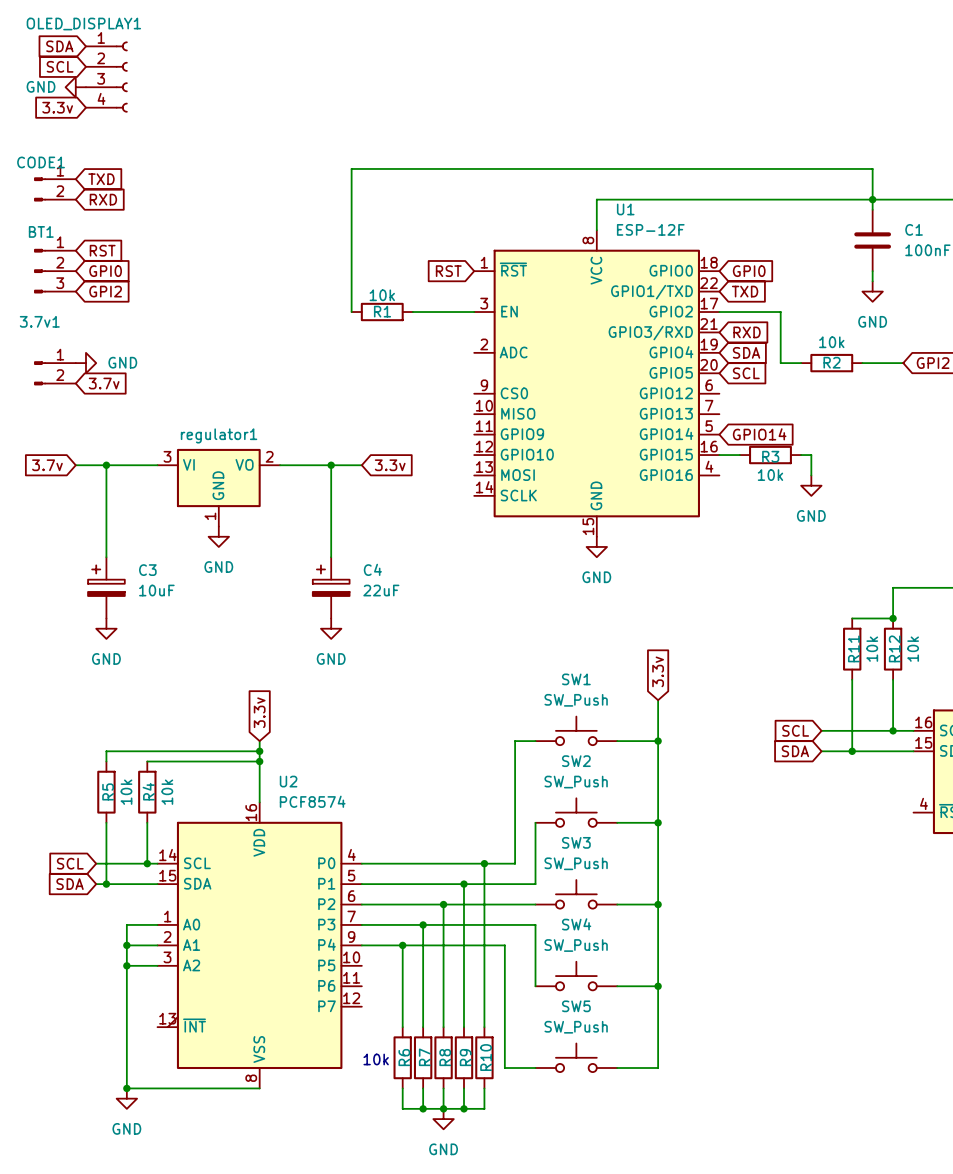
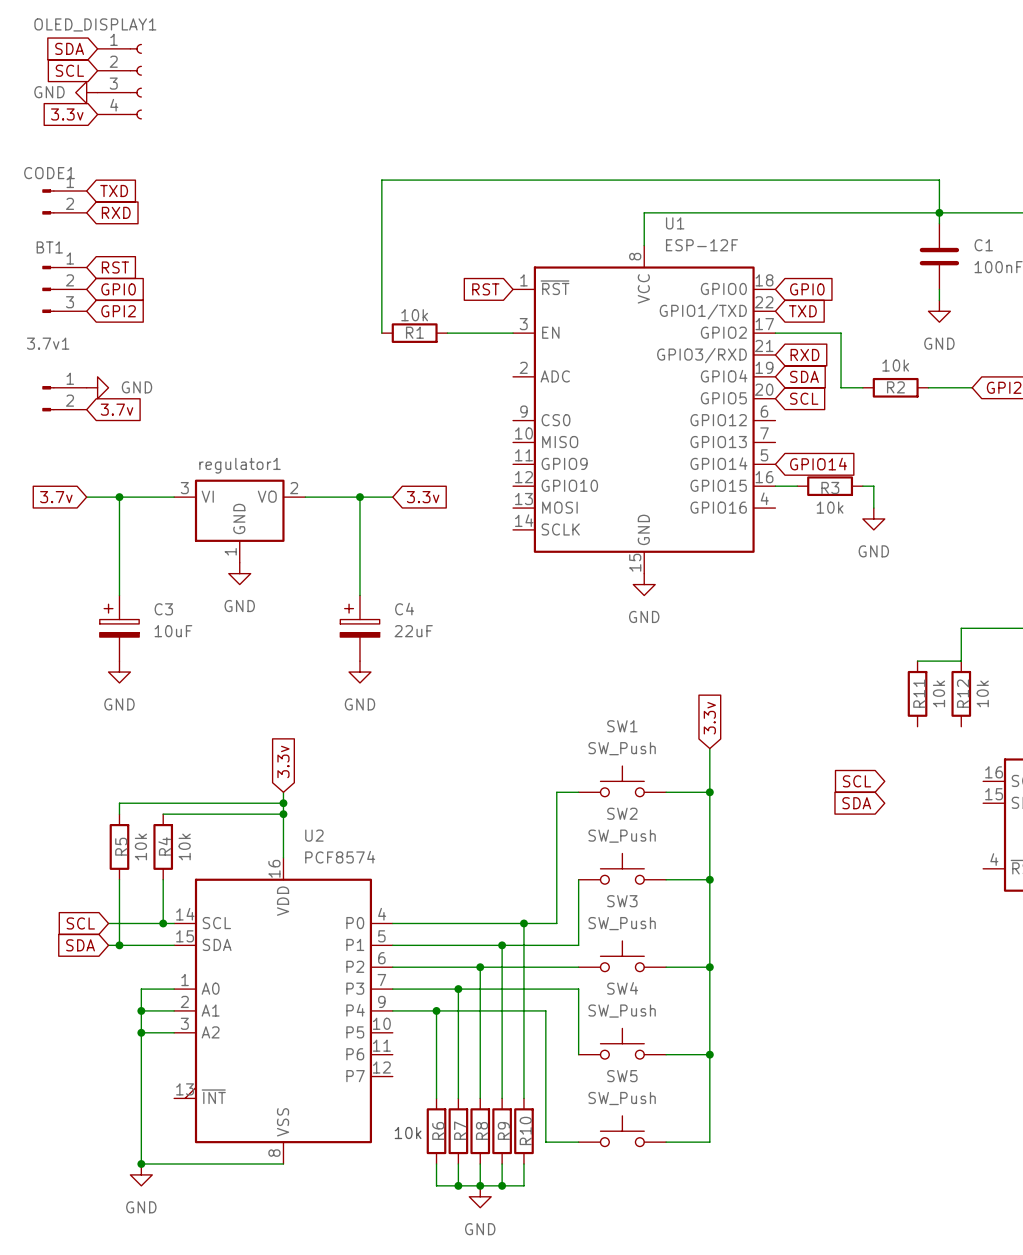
junction: (893, 618) -> none
wire: (852, 679) (852, 751) -> none
wire: (893, 679) (893, 730) -> none
wire: (821, 730) (913, 730) -> none
junction: (893, 730) -> none
wire: (821, 751) (913, 751) -> none
junction: (852, 751) -> none

